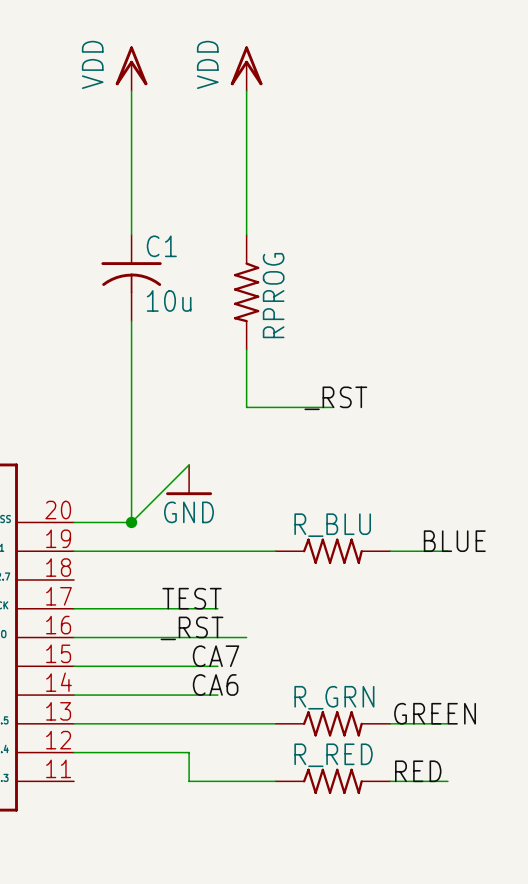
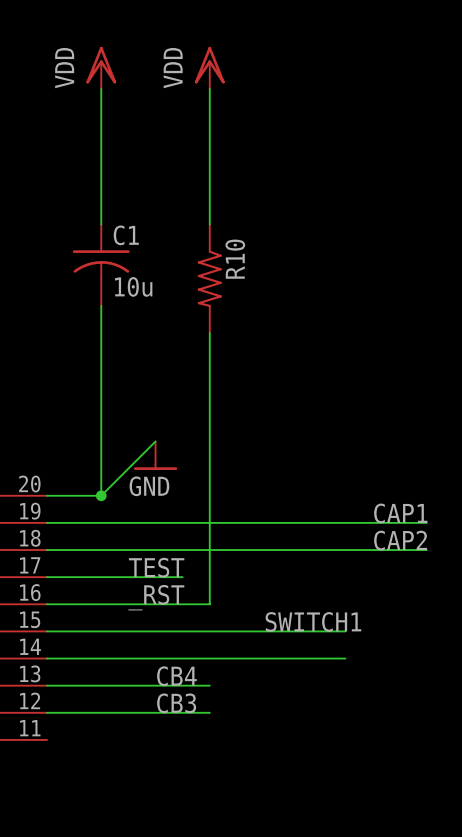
RPROG name: RPROG (273, 295) -> R10 (235, 259)
label: _RST (335, 398) -> none
wire: (246, 407) (332, 407) -> (209, 387) (209, 604)
label: BLUE (454, 541) -> CAP1 (400, 513)
R_BLU: (332, 551) -> none
label: none -> CAP2 (400, 540)
wire: none -> (47, 550) (426, 550)
label: CA7 (216, 656) -> none
label: none -> SWITCH1 (313, 621)
wire: none -> (182, 631) (345, 631)
label: CA6 (215, 684) -> none
wire: none -> (182, 658) (345, 658)
label: none -> CB4 (176, 676)
label: GREEN (435, 713) -> none
wire: (246, 723) (275, 723) -> (399, 522) (426, 522)
R_GRN: (332, 723) -> none
wire: (390, 723) (447, 723) -> none
label: none -> CB3 (176, 703)
wire: (189, 752) (189, 781) (275, 781) -> (155, 712) (209, 712)
label: RED (418, 771) -> none
R_RED: (332, 781) -> none
wire: (390, 781) (447, 781) -> none

